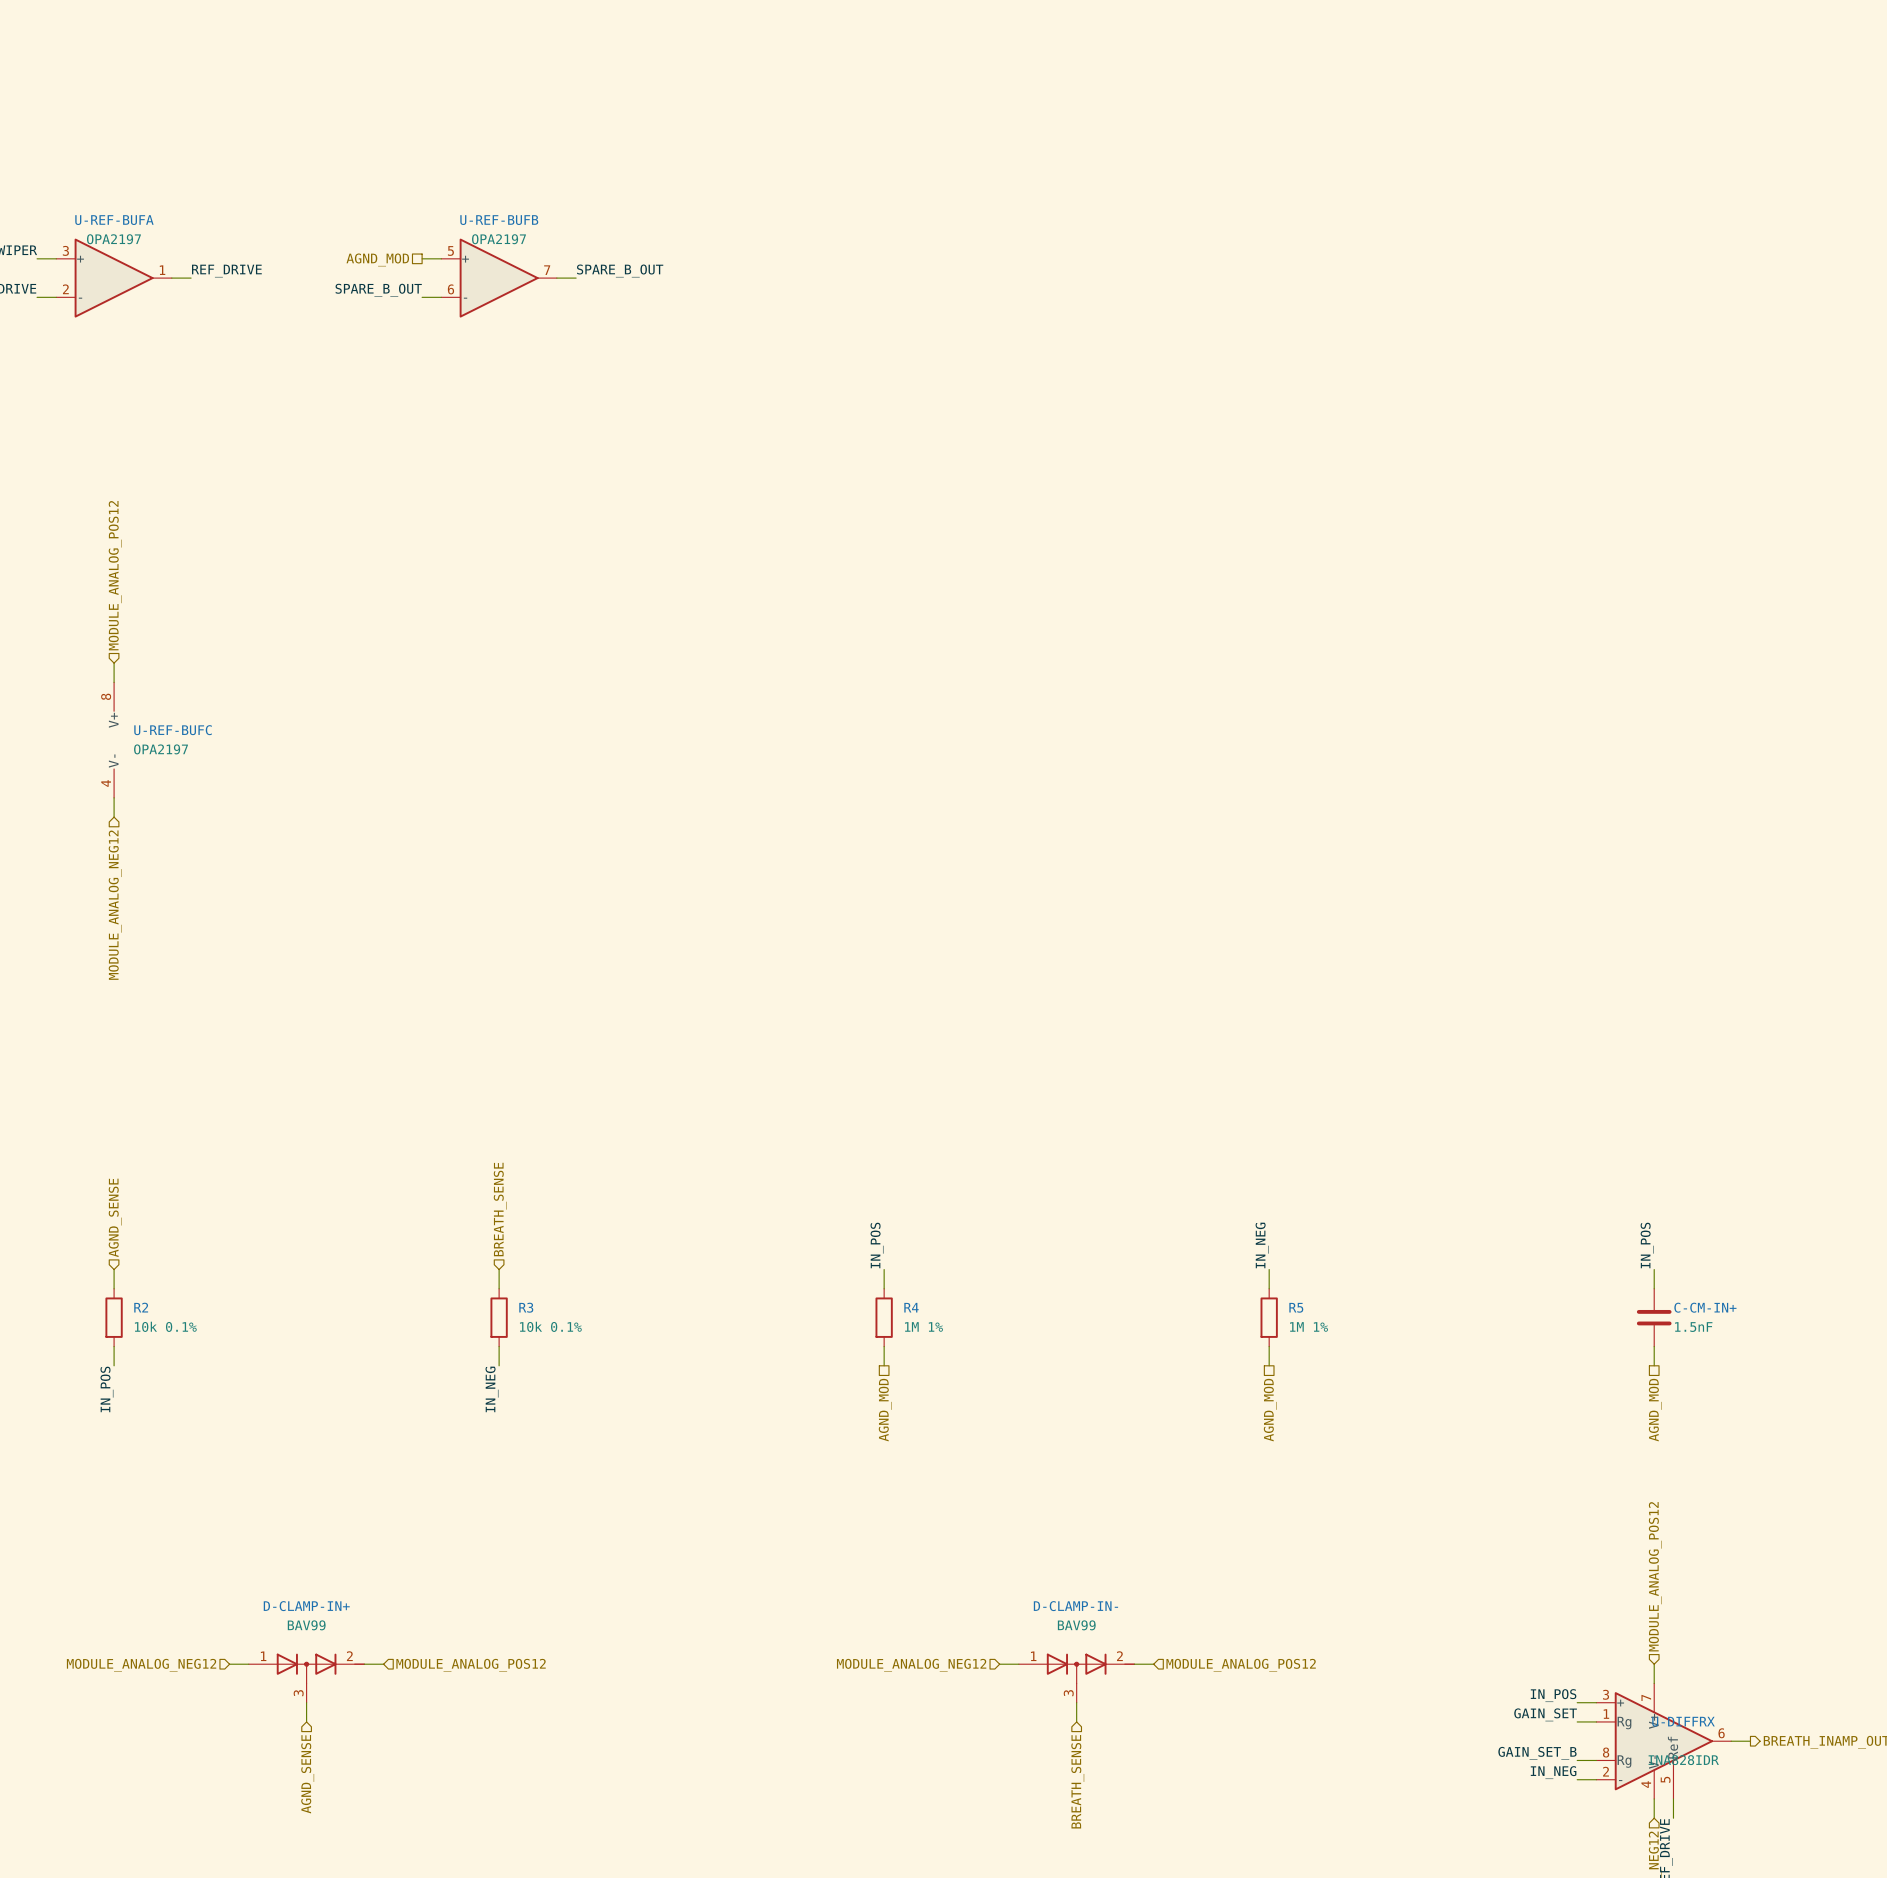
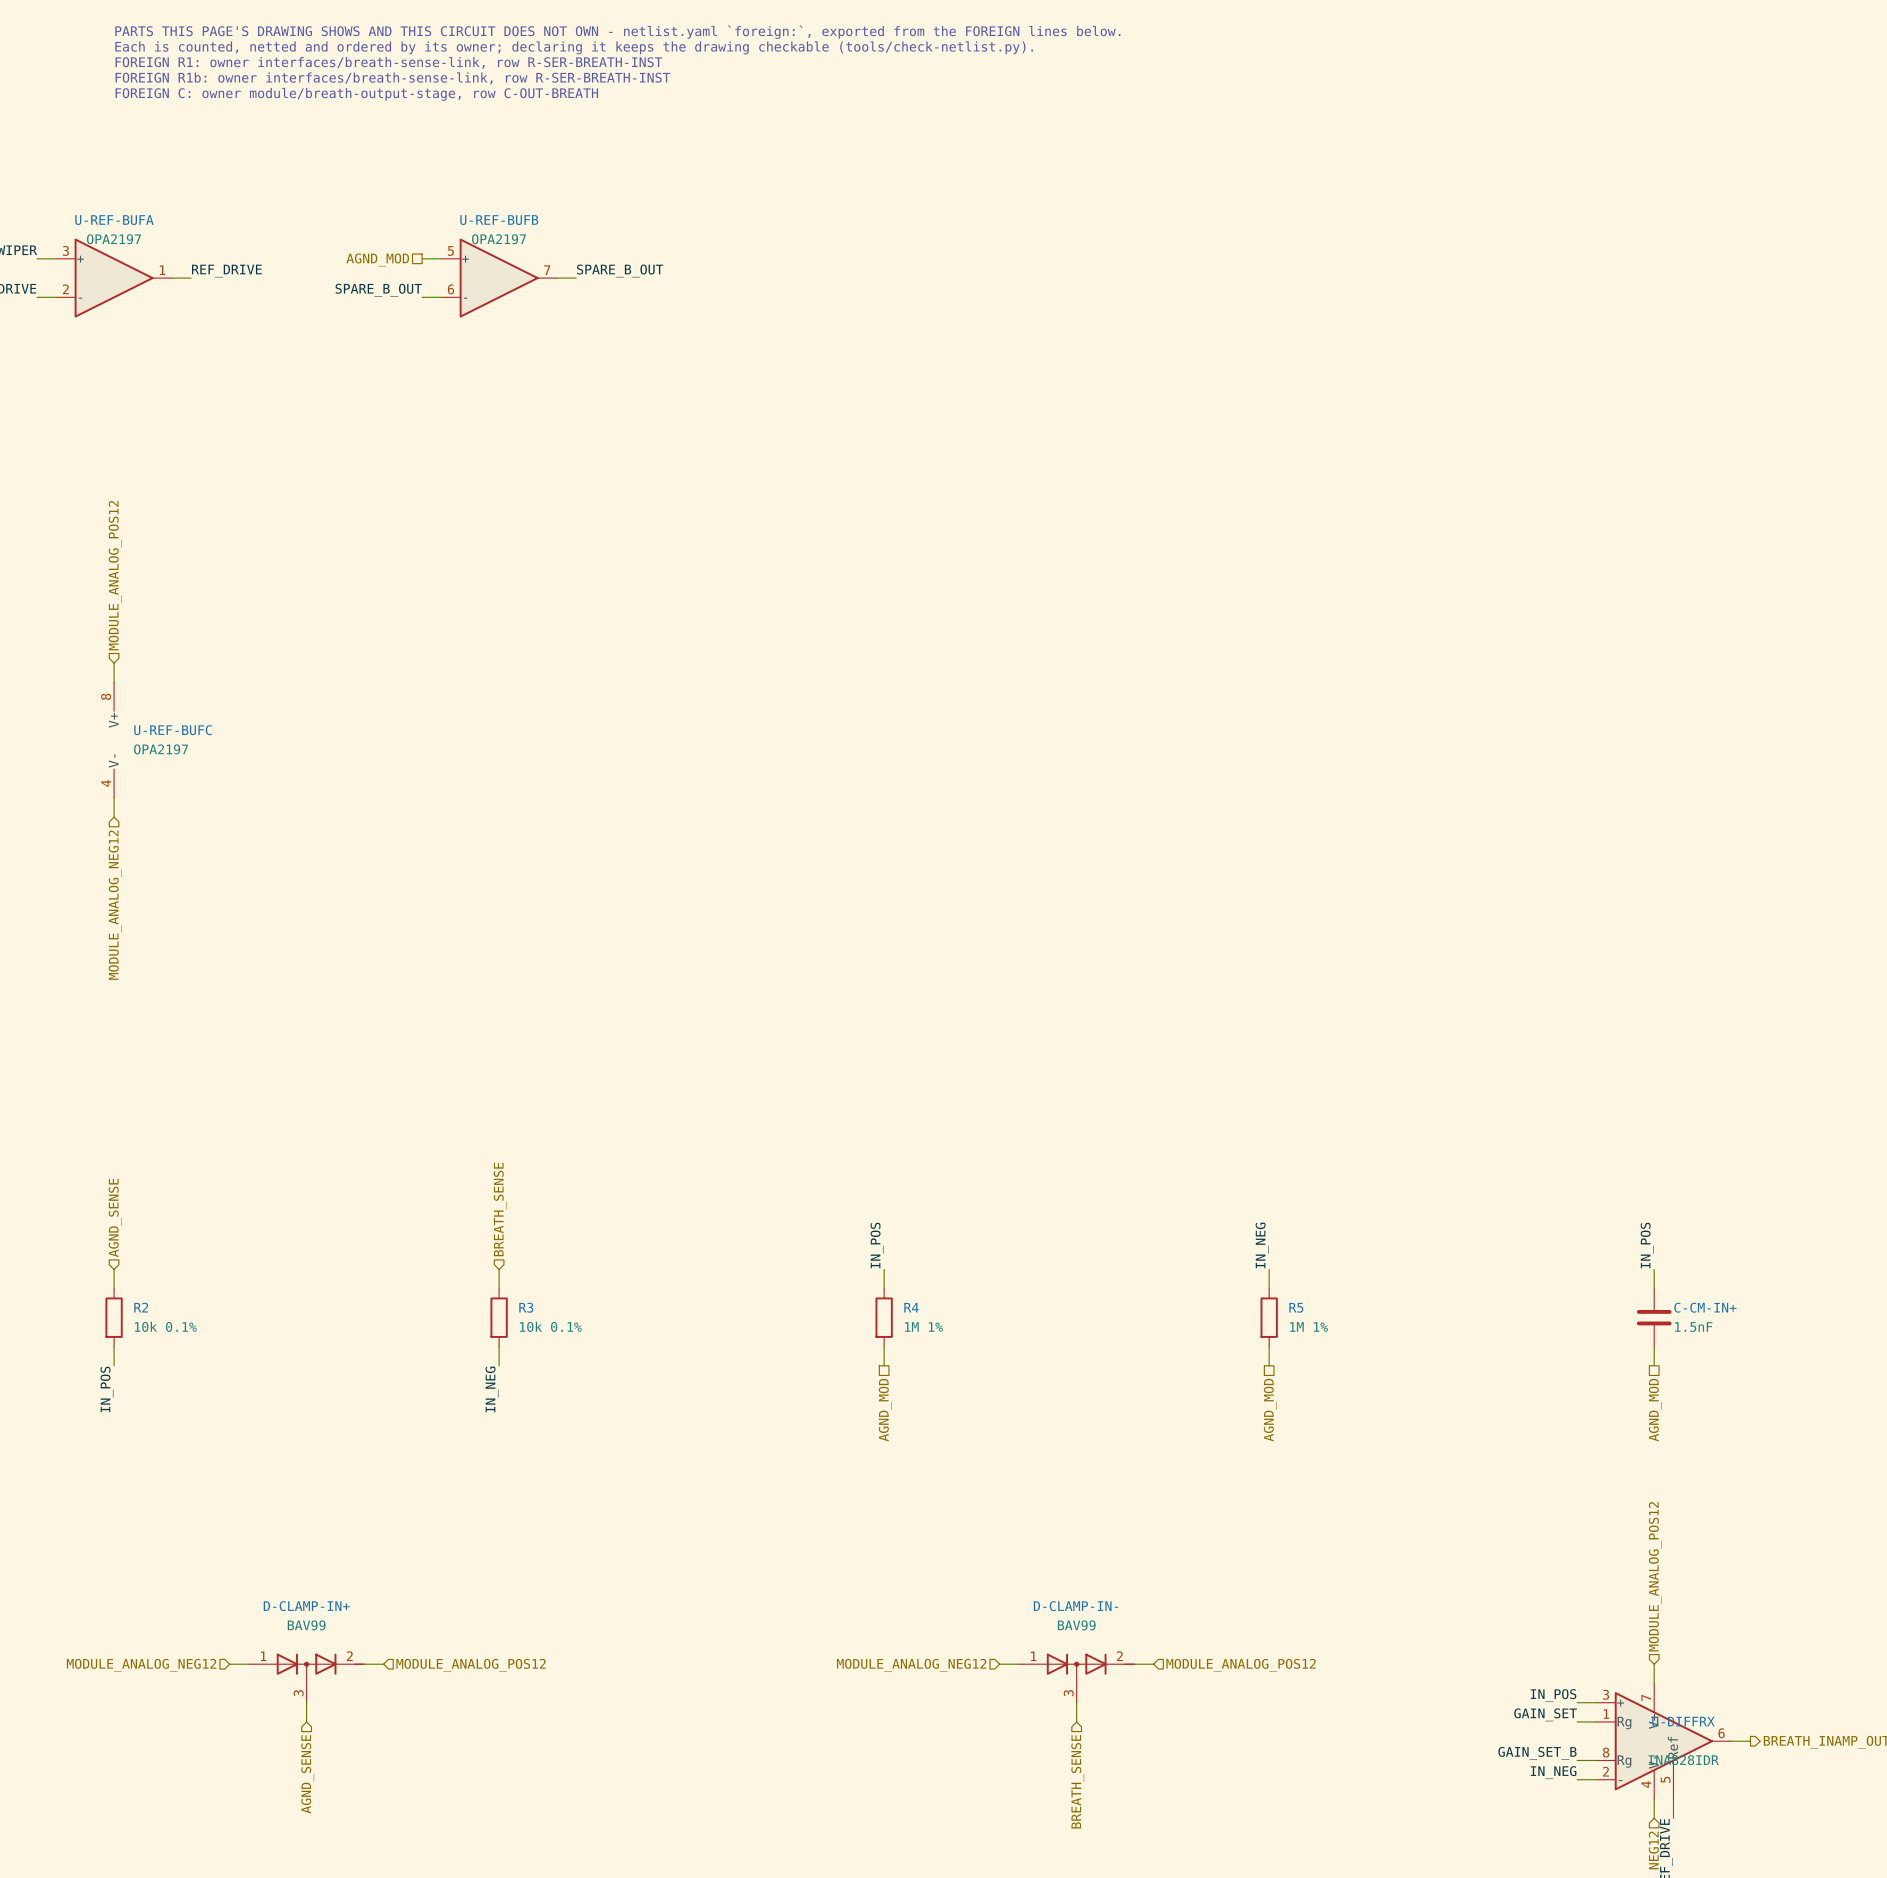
text: none -> PARTS THIS PAGE'S DRAWING SHOWS AND THIS CIRCUIT DOES NOT OWN - netlist.yaml `foreign:`, exported from the FOREIGN lines below. (617, 32)
text: none -> Each is counted, netted and ordered by its owner; declaring it keeps the drawing checkable (tools/check-netlist.py). (574, 47)
text: none -> FOREIGN R1: owner interfaces/breath-sense-link, row R-SER-BREATH-INST (388, 62)
text: none -> FOREIGN R1b: owner interfaces/breath-sense-link, row R-SER-BREATH-INST (392, 78)
text: none -> FOREIGN C: owner module/breath-output-stage, row C-OUT-BREATH (356, 94)

